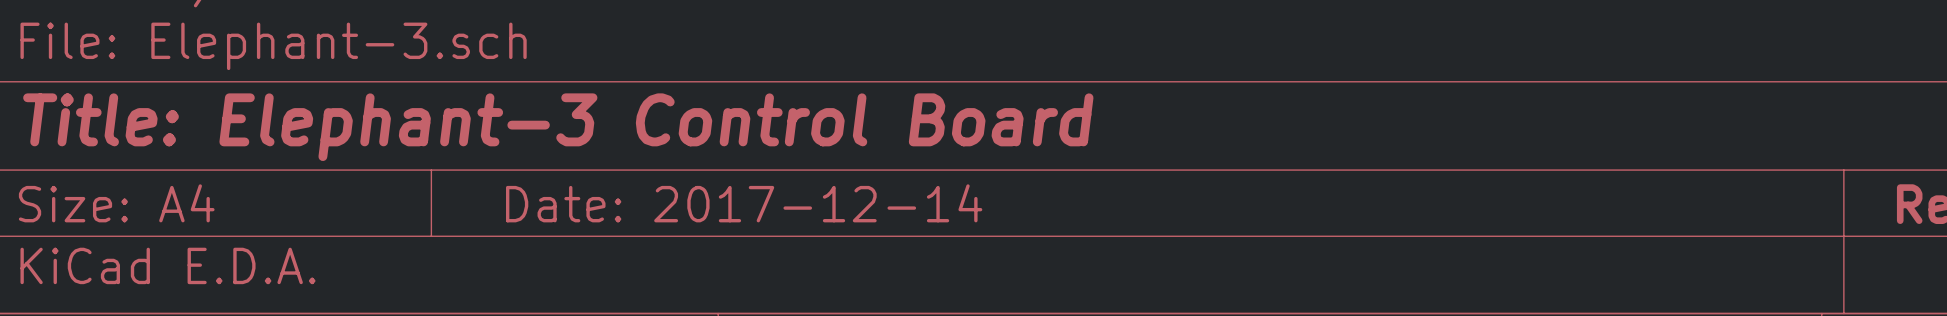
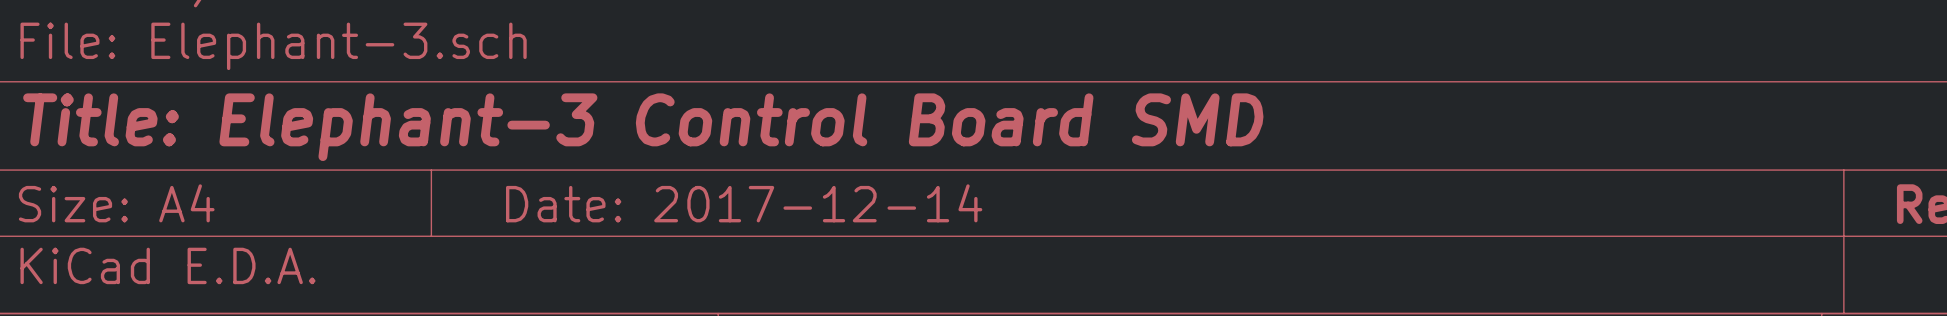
title block: Title: Elephant-3 Control Board (558, 127) -> Title: Elephant-3 Control Board SMD (643, 127)

